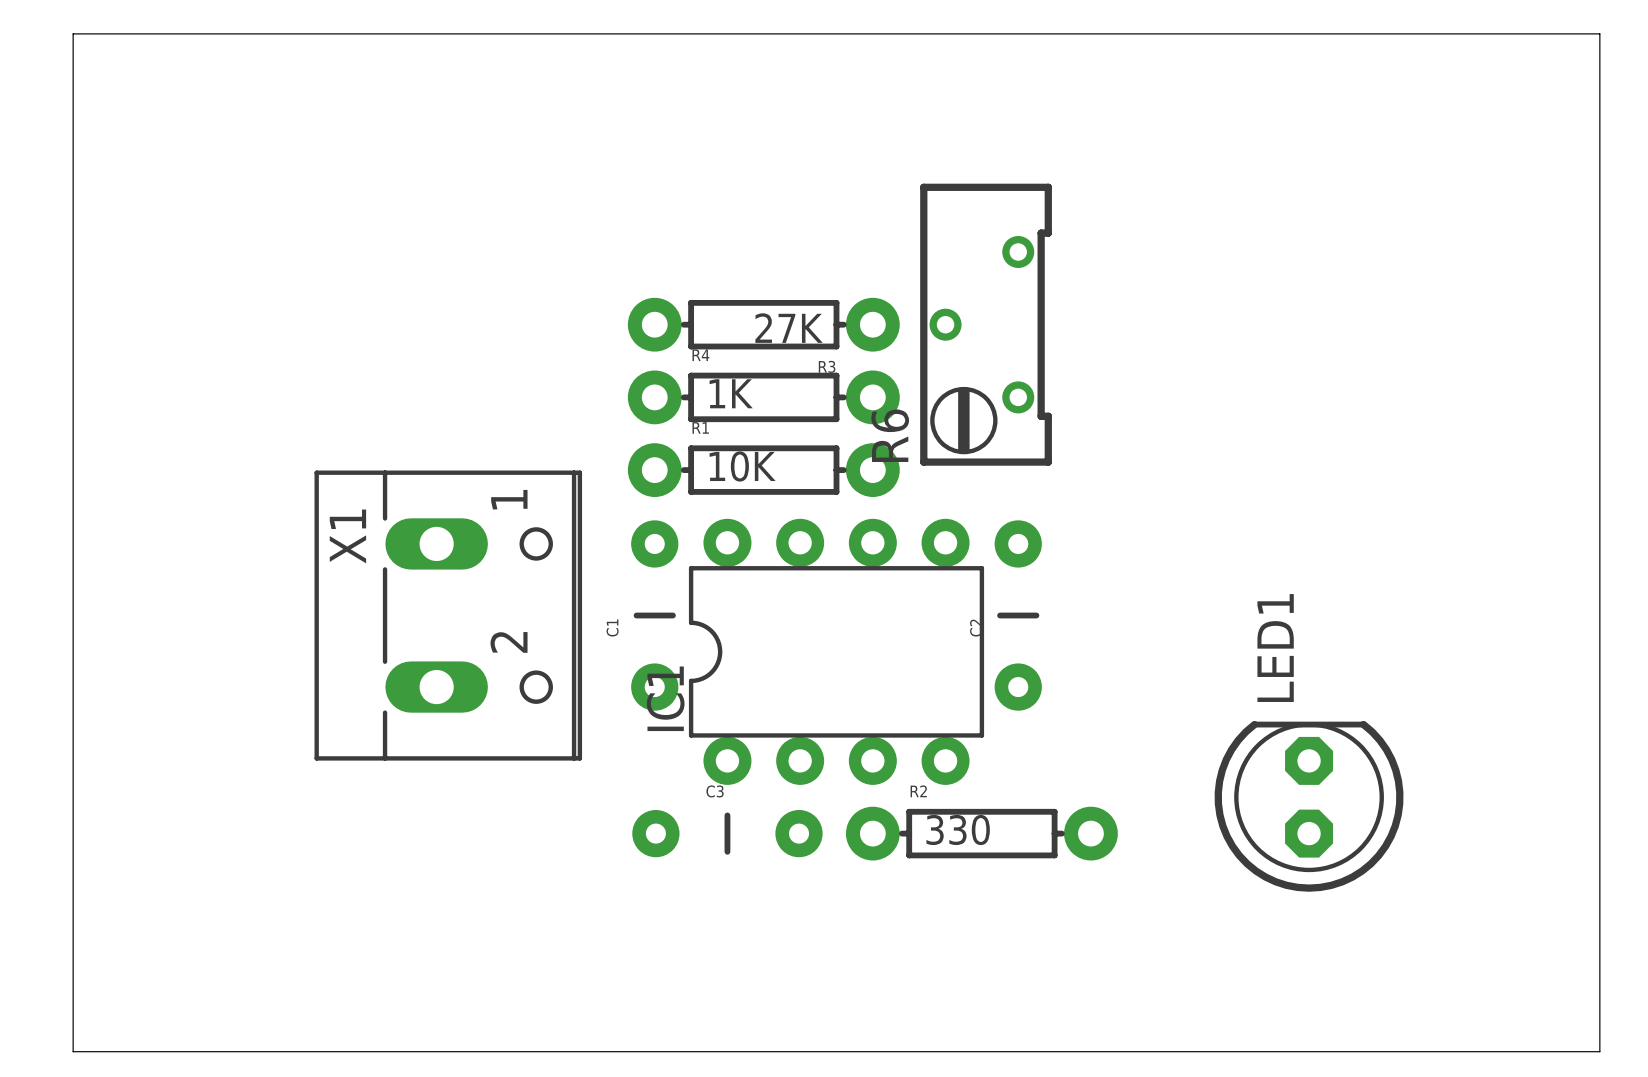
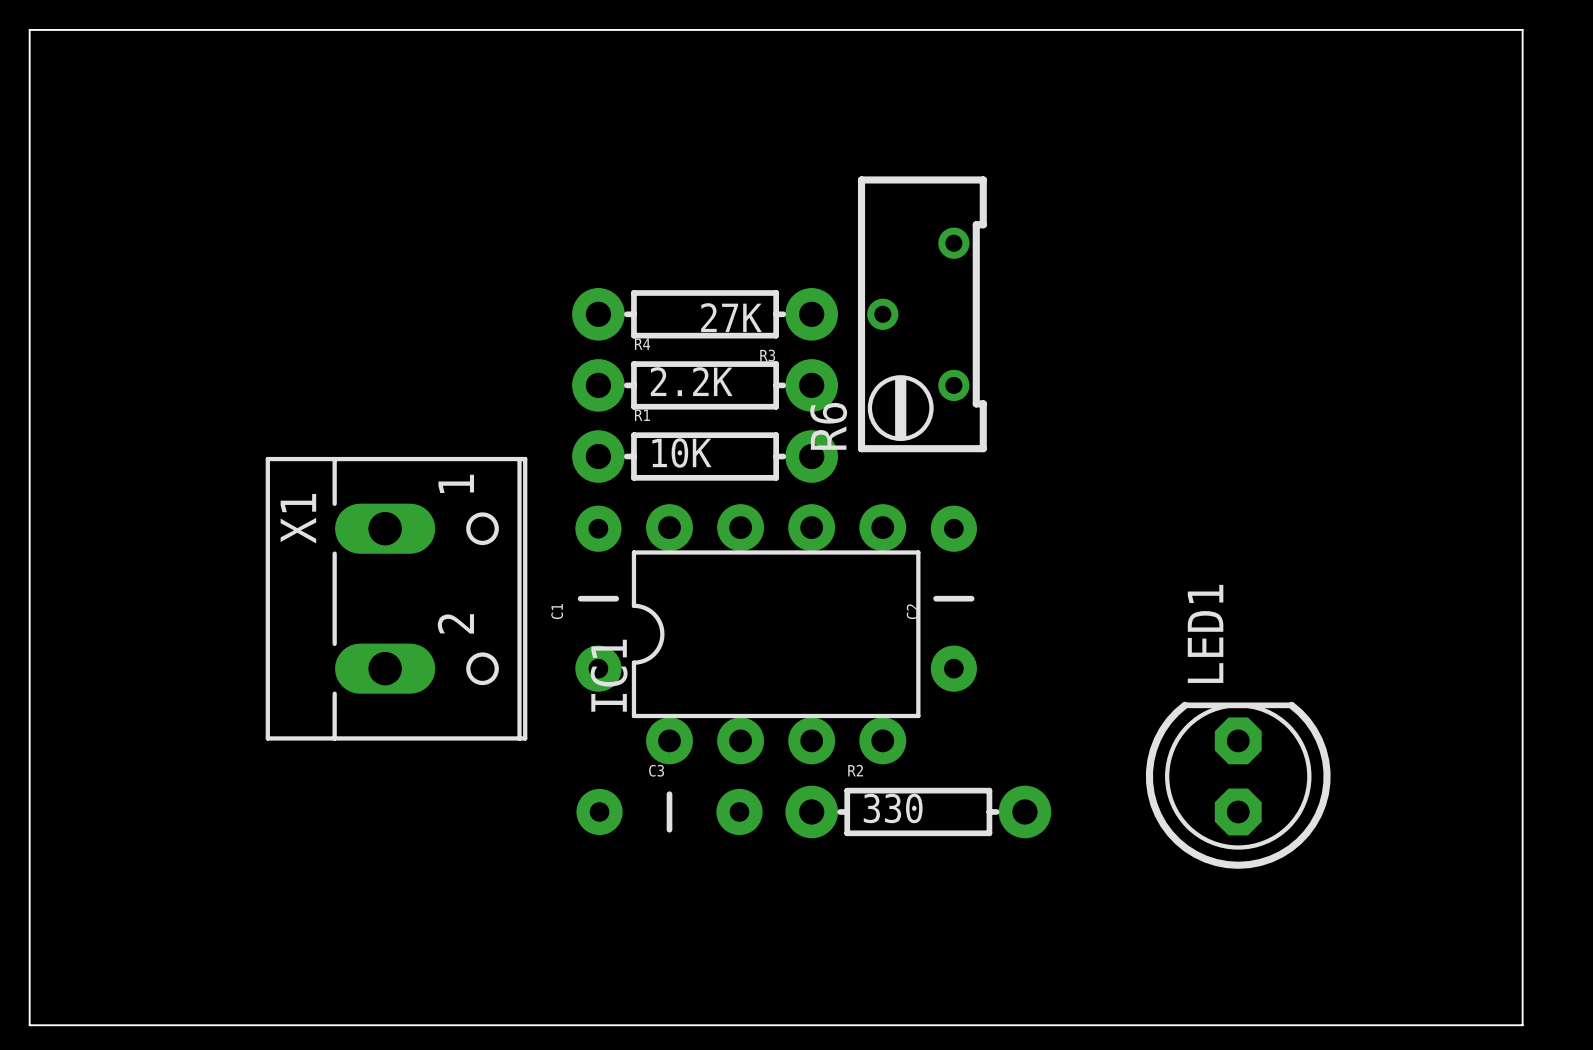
R4 value: 1K (731, 393) -> 2.2K (691, 381)

